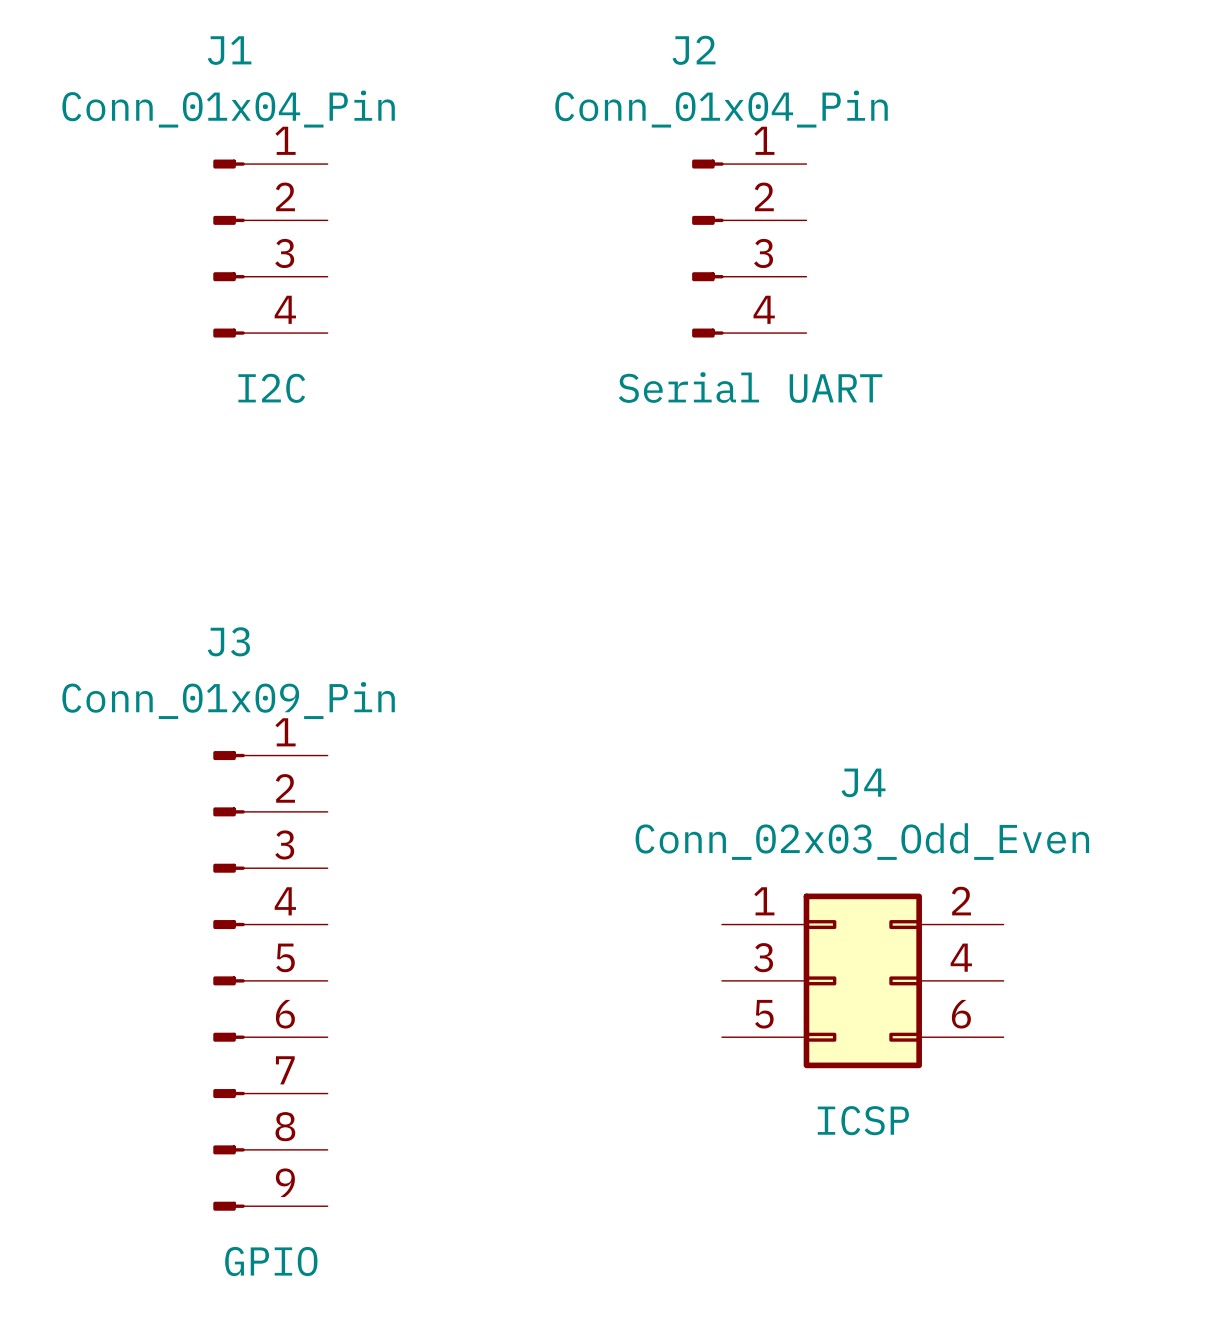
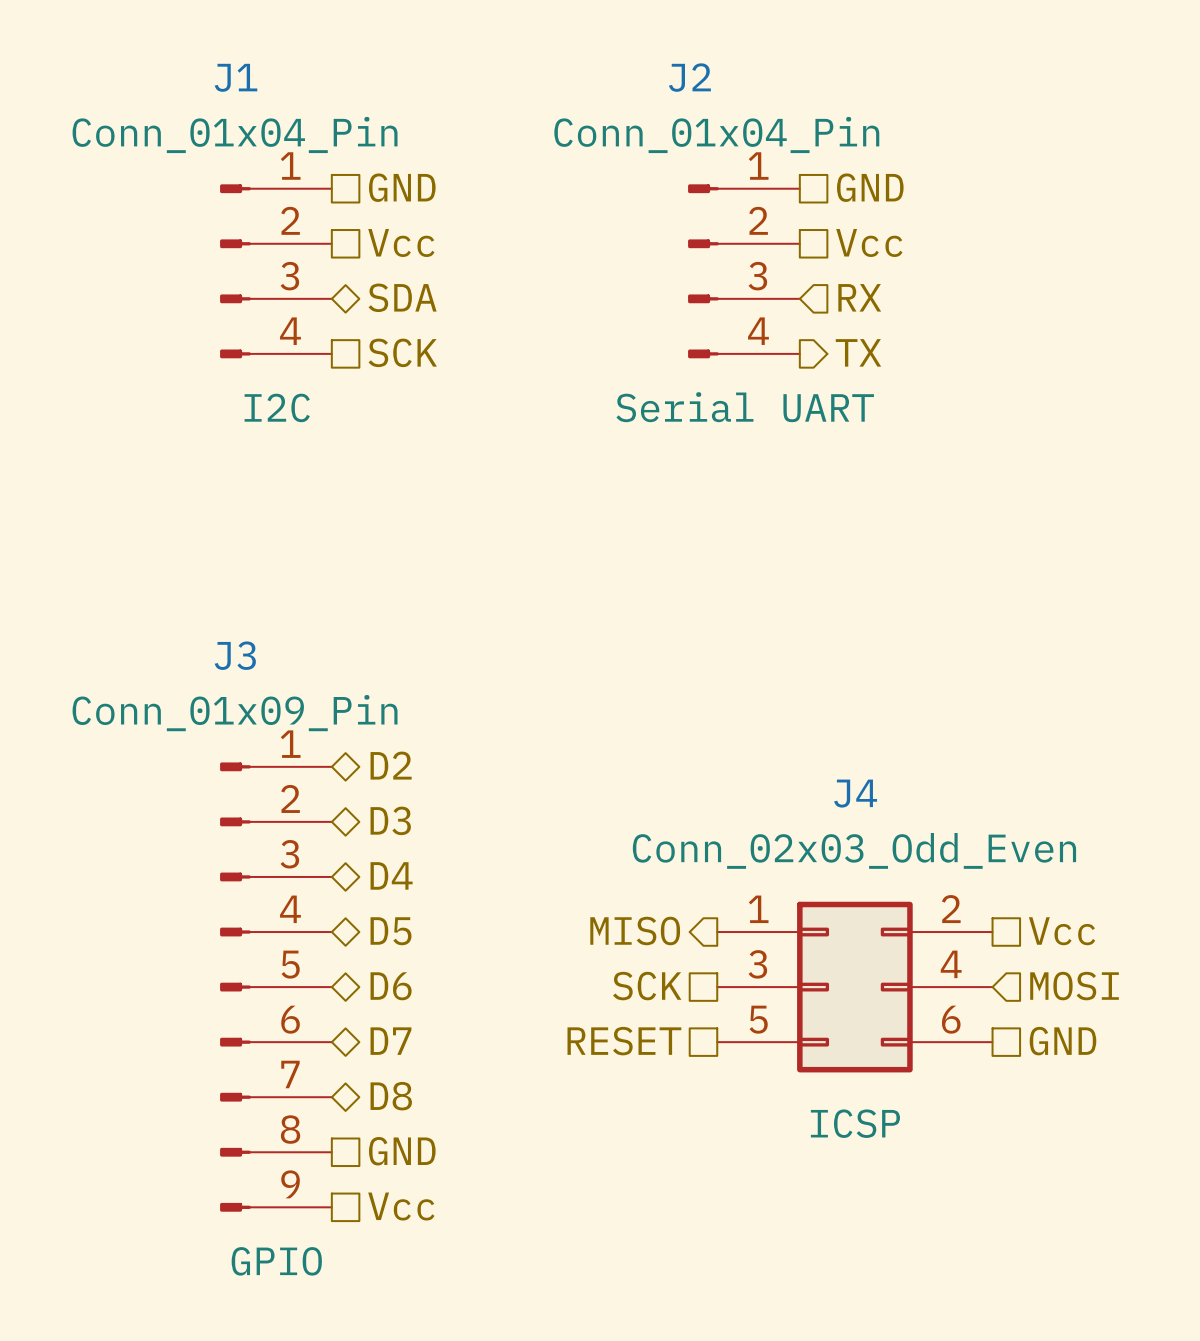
hierarchical label: none -> GND (402, 187)
hierarchical label: none -> GND (870, 187)
hierarchical label: none -> Vcc (401, 242)
hierarchical label: none -> Vcc (869, 242)
hierarchical label: none -> SDA (402, 297)
hierarchical label: none -> RX (859, 297)
hierarchical label: none -> SCK (402, 352)
hierarchical label: none -> TX (858, 352)
hierarchical label: none -> D2 (391, 765)
hierarchical label: none -> D3 (390, 820)
hierarchical label: none -> D4 (391, 875)
hierarchical label: none -> D5 (391, 931)
hierarchical label: none -> MISO (635, 930)
hierarchical label: none -> Vcc (1062, 931)
hierarchical label: none -> SCK (647, 986)
hierarchical label: none -> MOSI (1074, 986)
hierarchical label: none -> D6 (391, 986)
hierarchical label: none -> D7 (390, 1041)
hierarchical label: none -> RESET (624, 1041)
hierarchical label: none -> GND (1063, 1041)
hierarchical label: none -> D8 (391, 1096)
hierarchical label: none -> GND (402, 1151)
hierarchical label: none -> Vcc (401, 1206)

